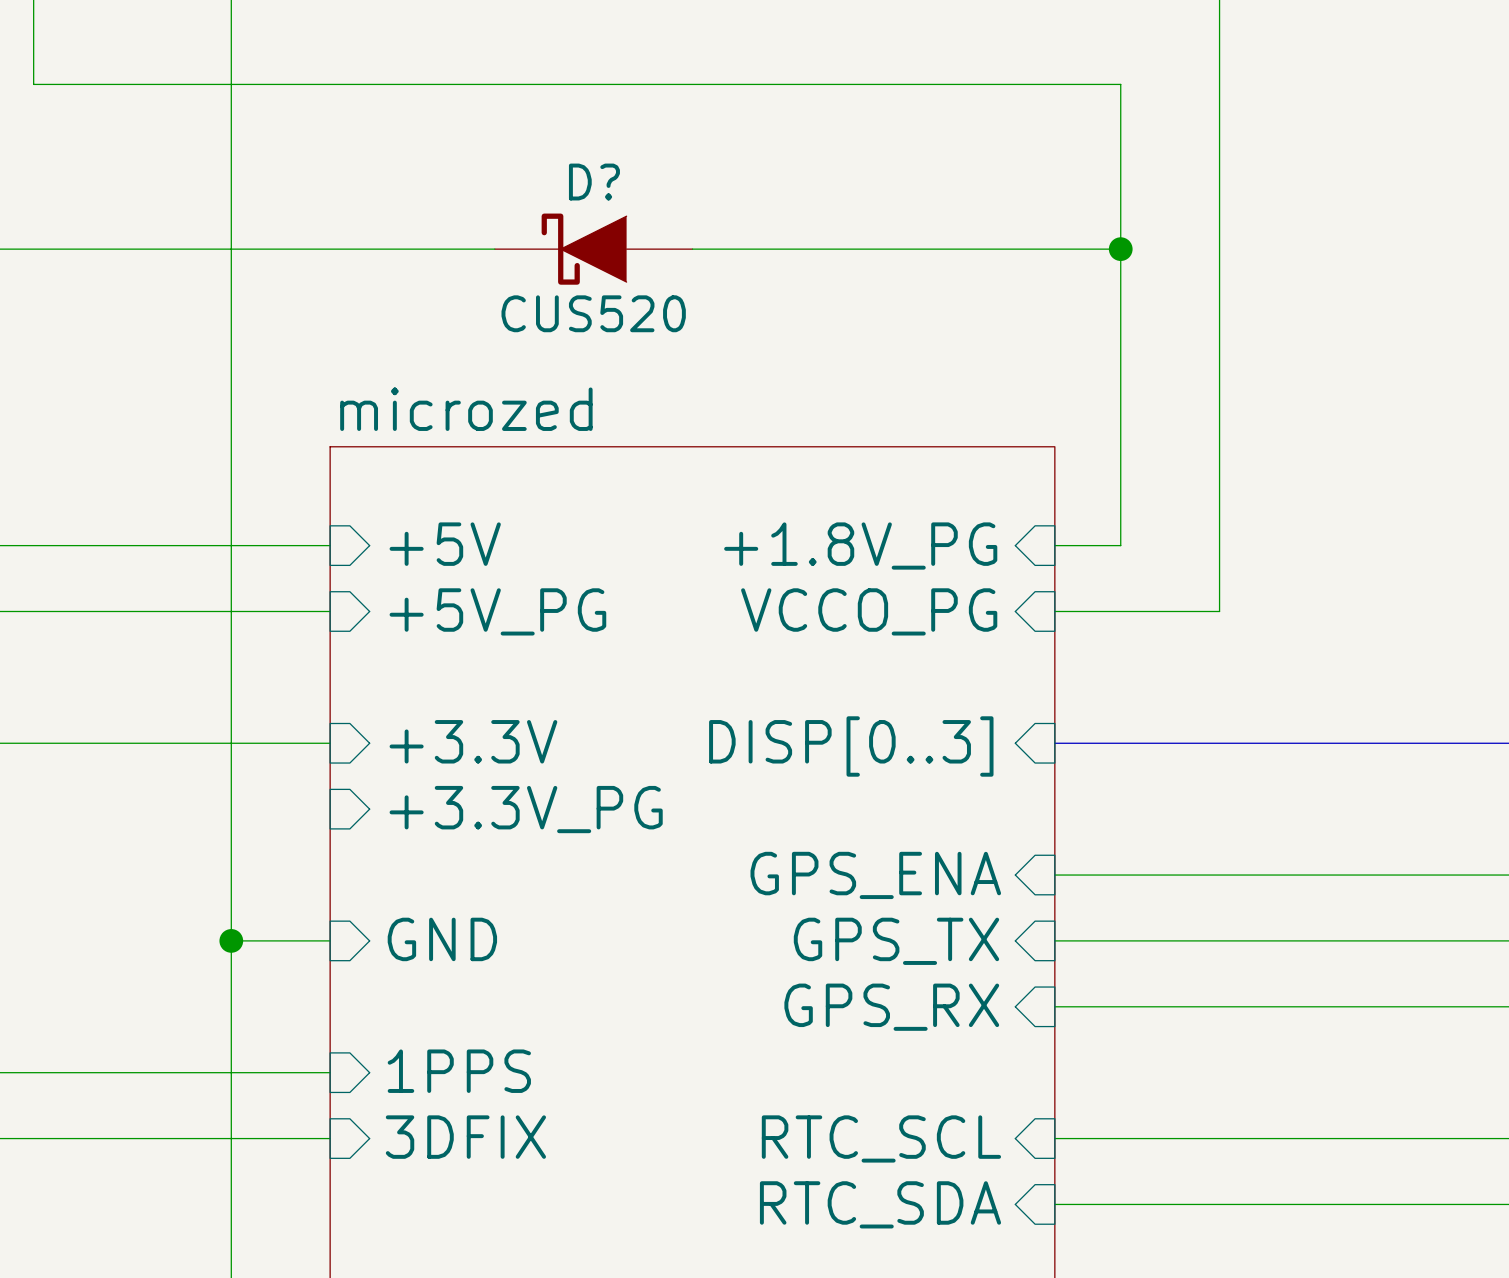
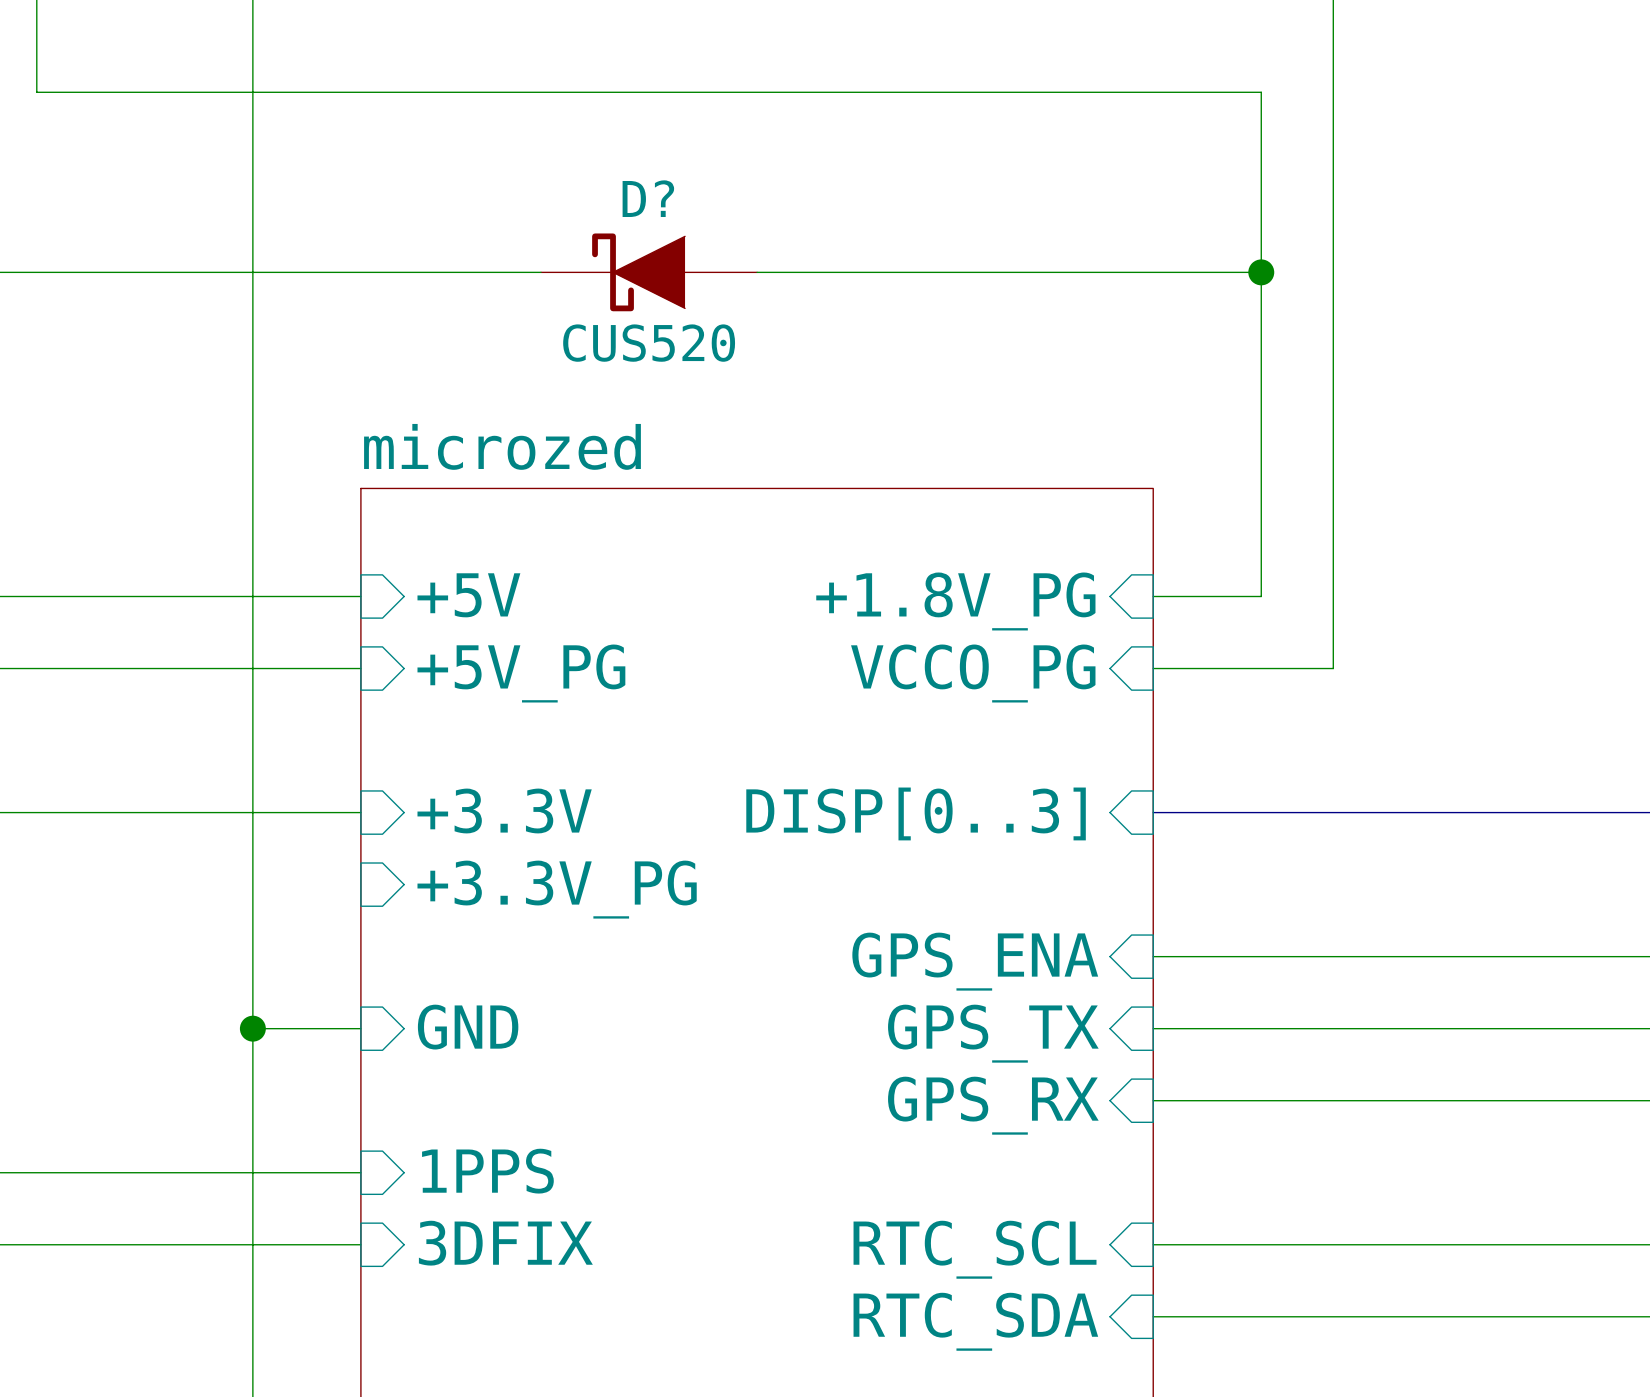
wire: (1120, 84) (1120, 545) -> (1225, 92) (1261, 92) (1261, 596) (1225, 596)
wire: none -> (1225, 272) (1261, 272)
junction position: (1120, 249) -> (1261, 272)

